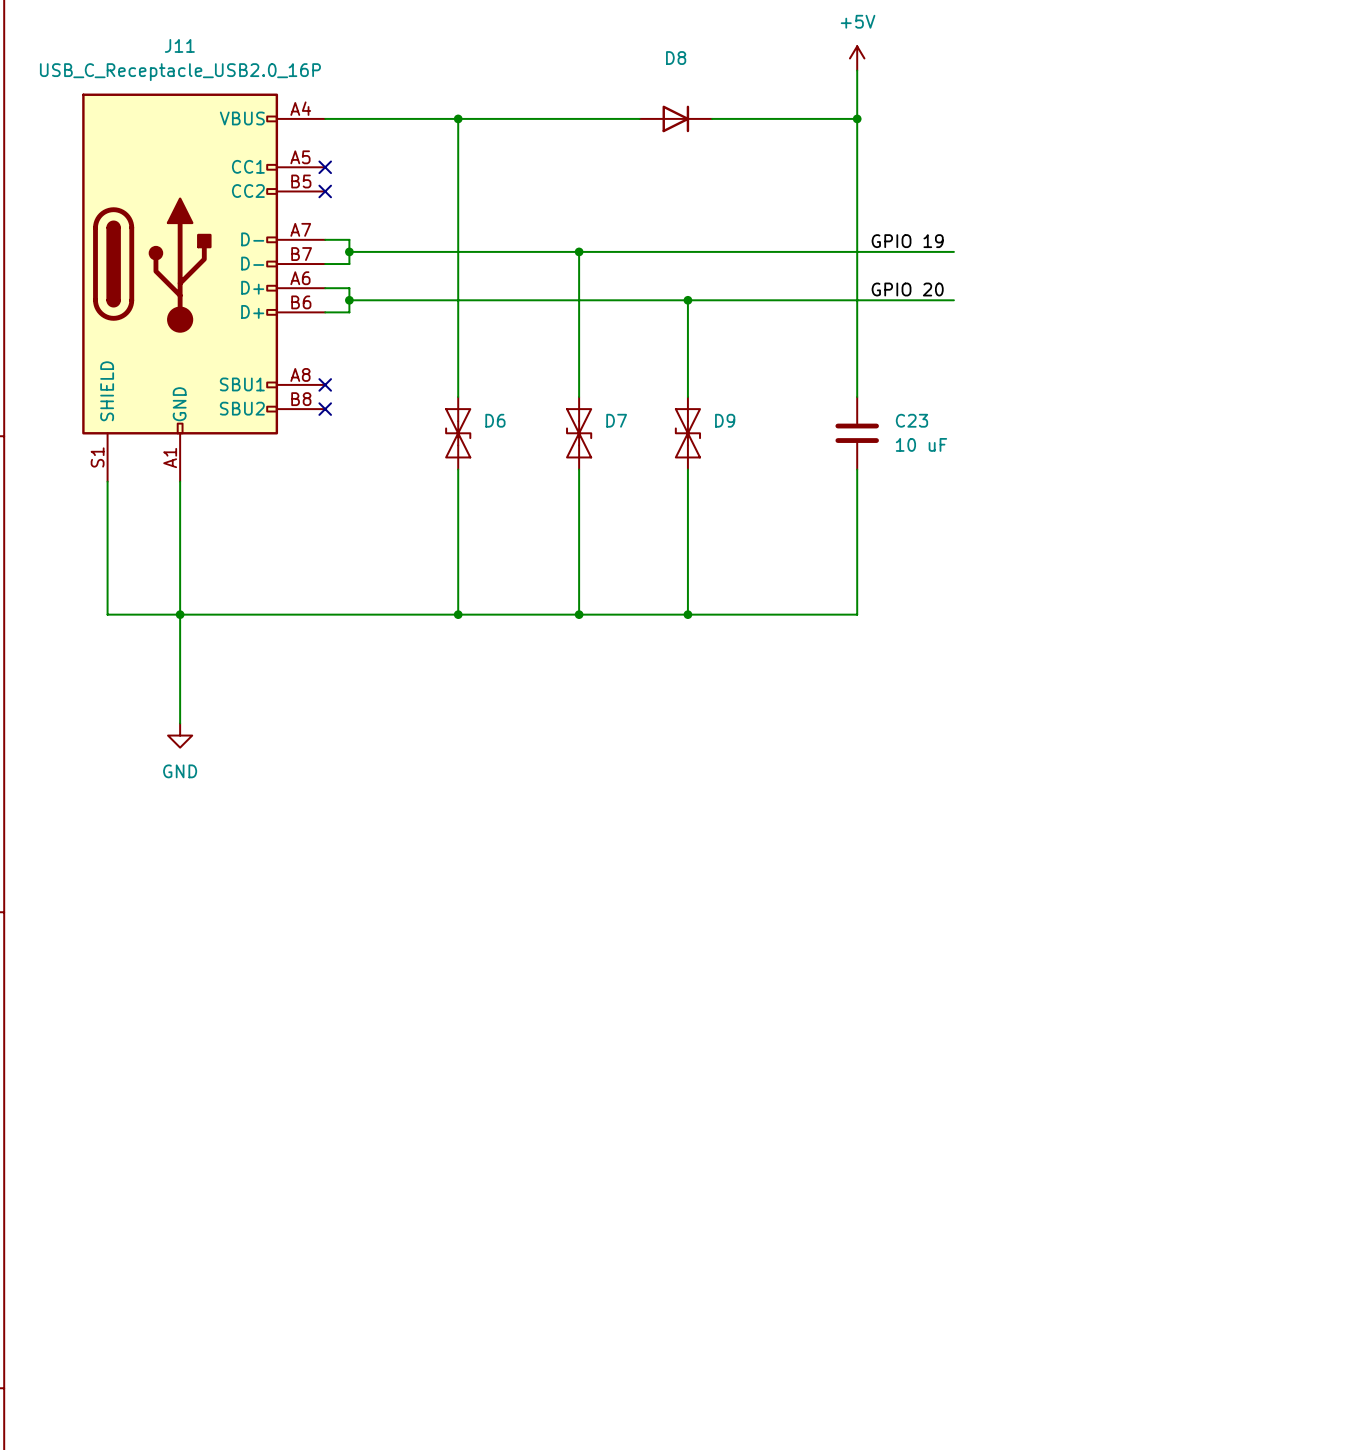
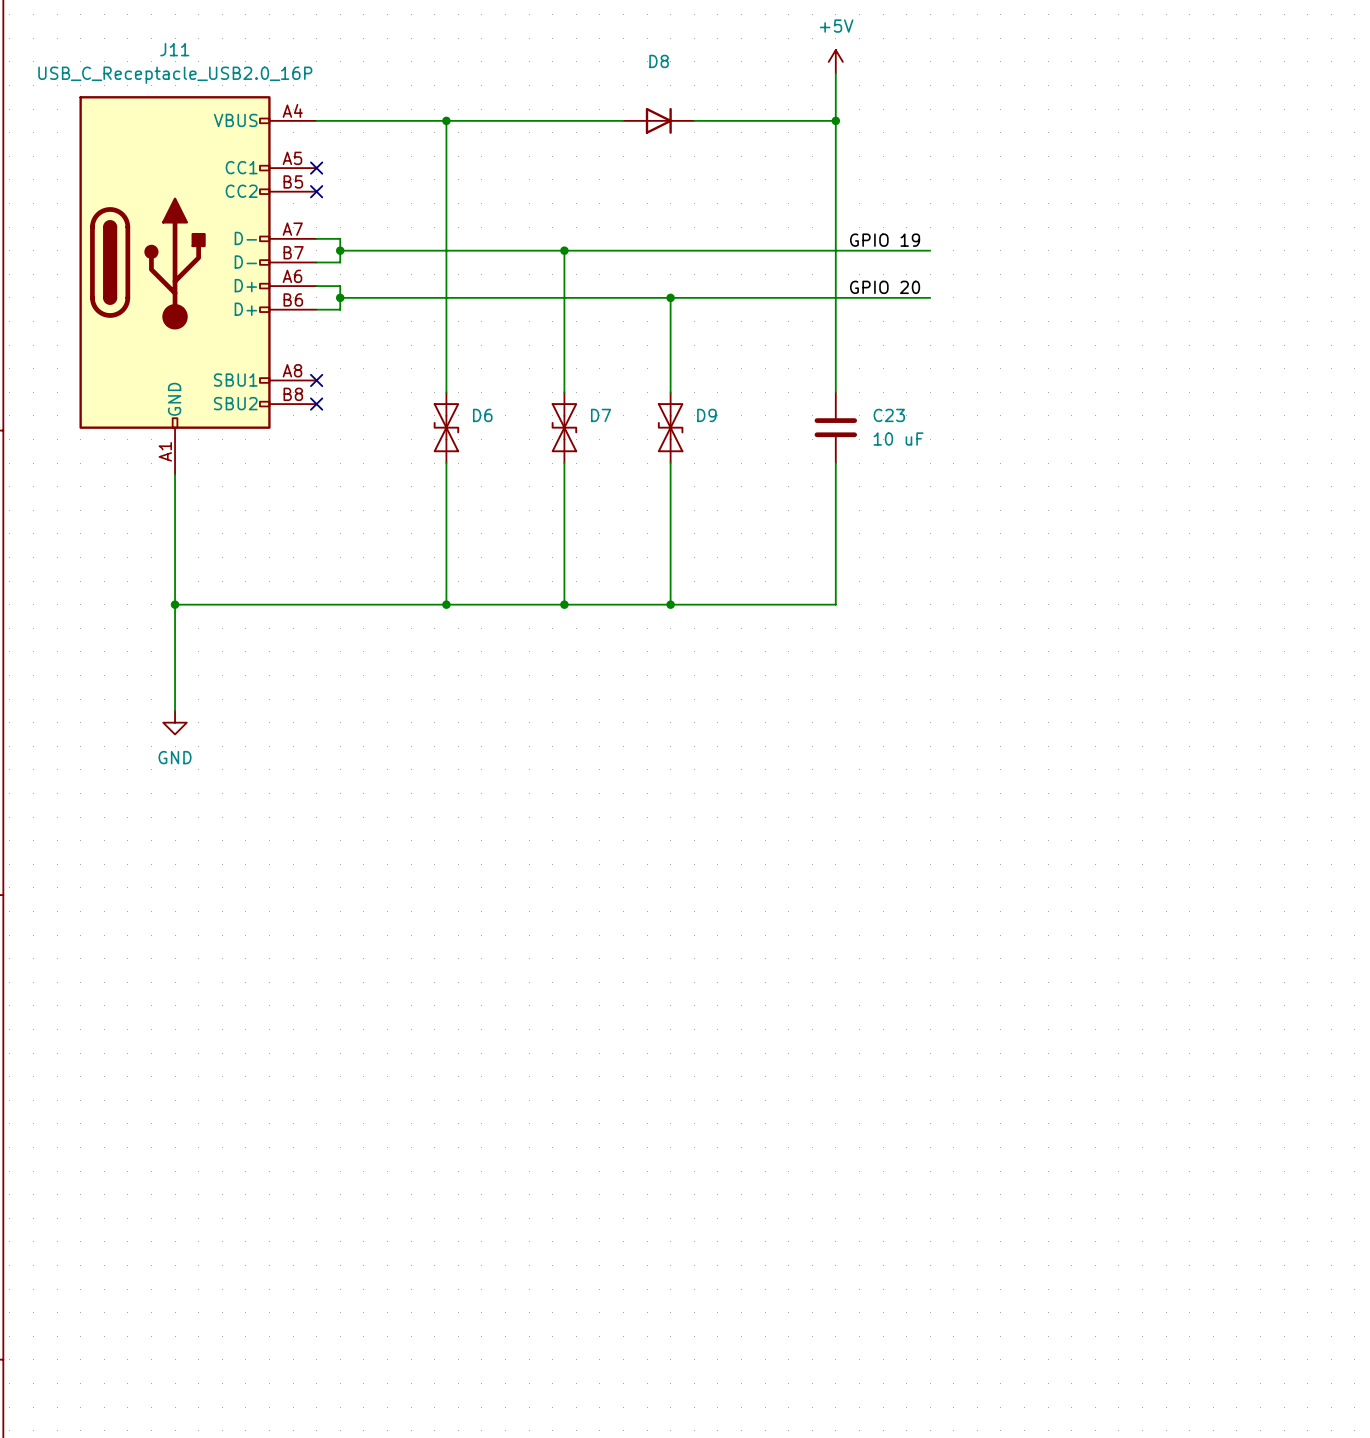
J11 symbol: [82, 93, 326, 482] -> [79, 96, 317, 475]
wire: (107, 481) (107, 614) (180, 614) -> none

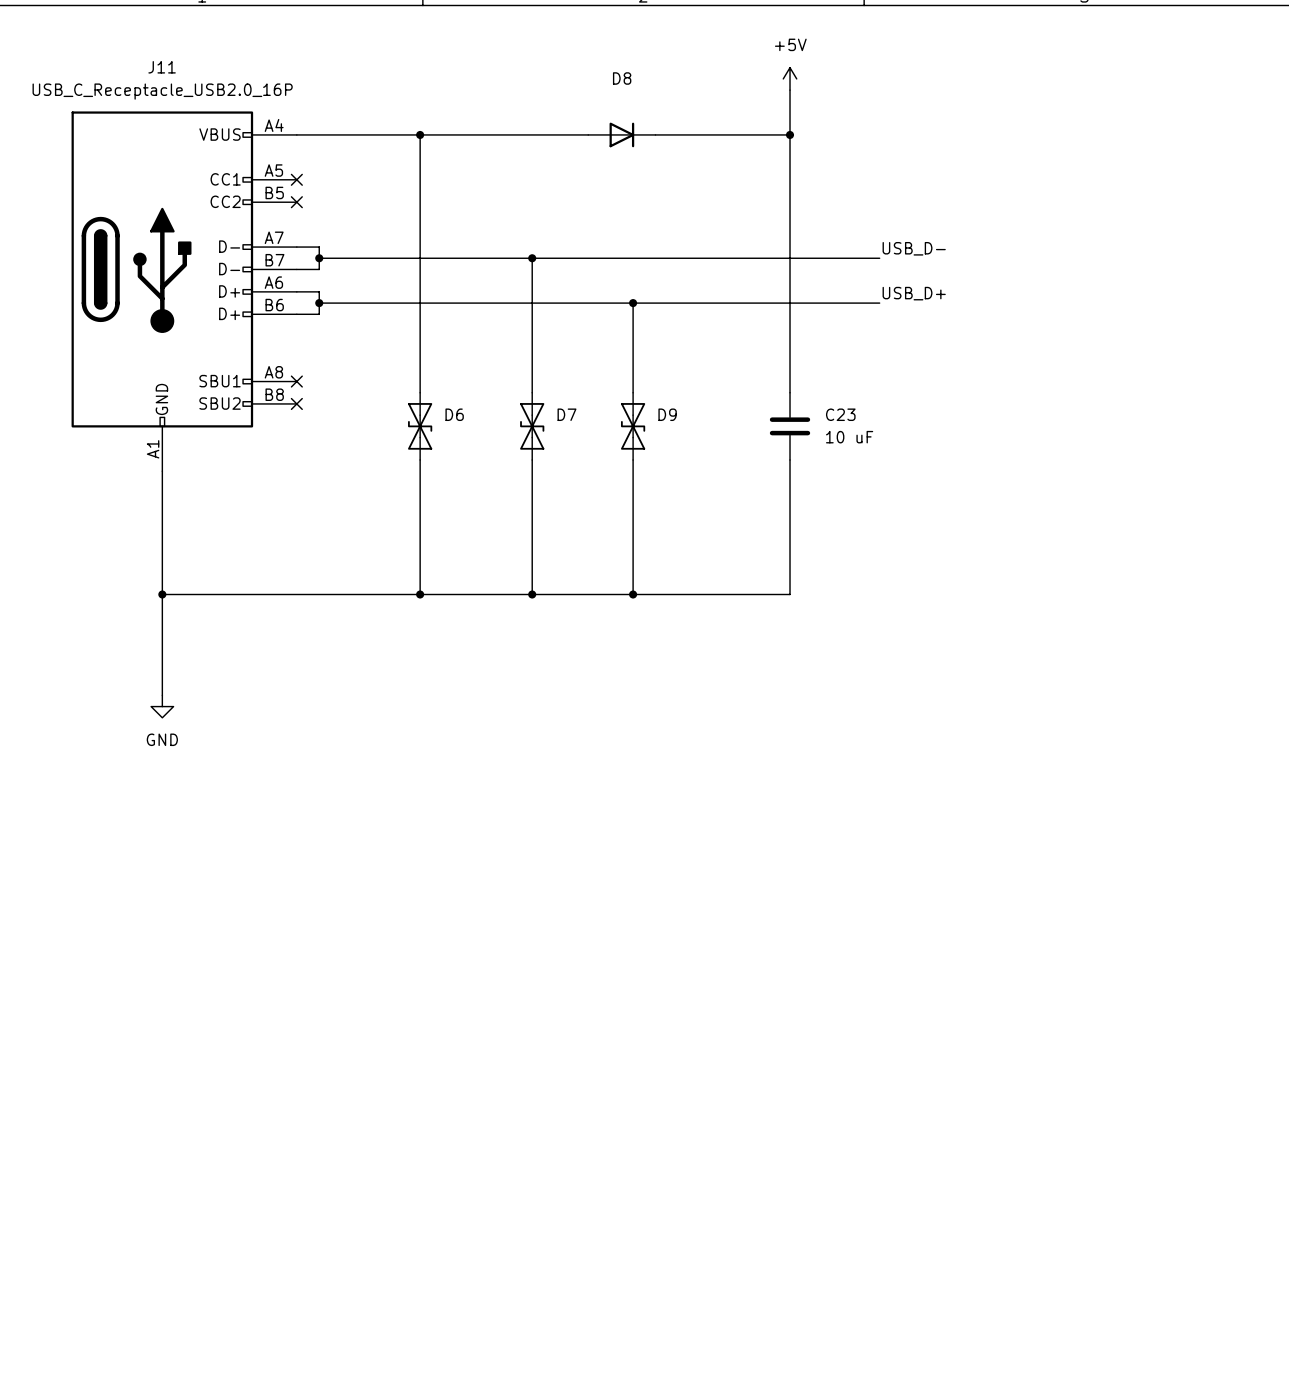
label: GPIO 19 (885, 240) -> none
label: none -> USB_D- (914, 248)
label: GPIO 20 (885, 287) -> none
label: none -> USB_D+ (914, 293)

